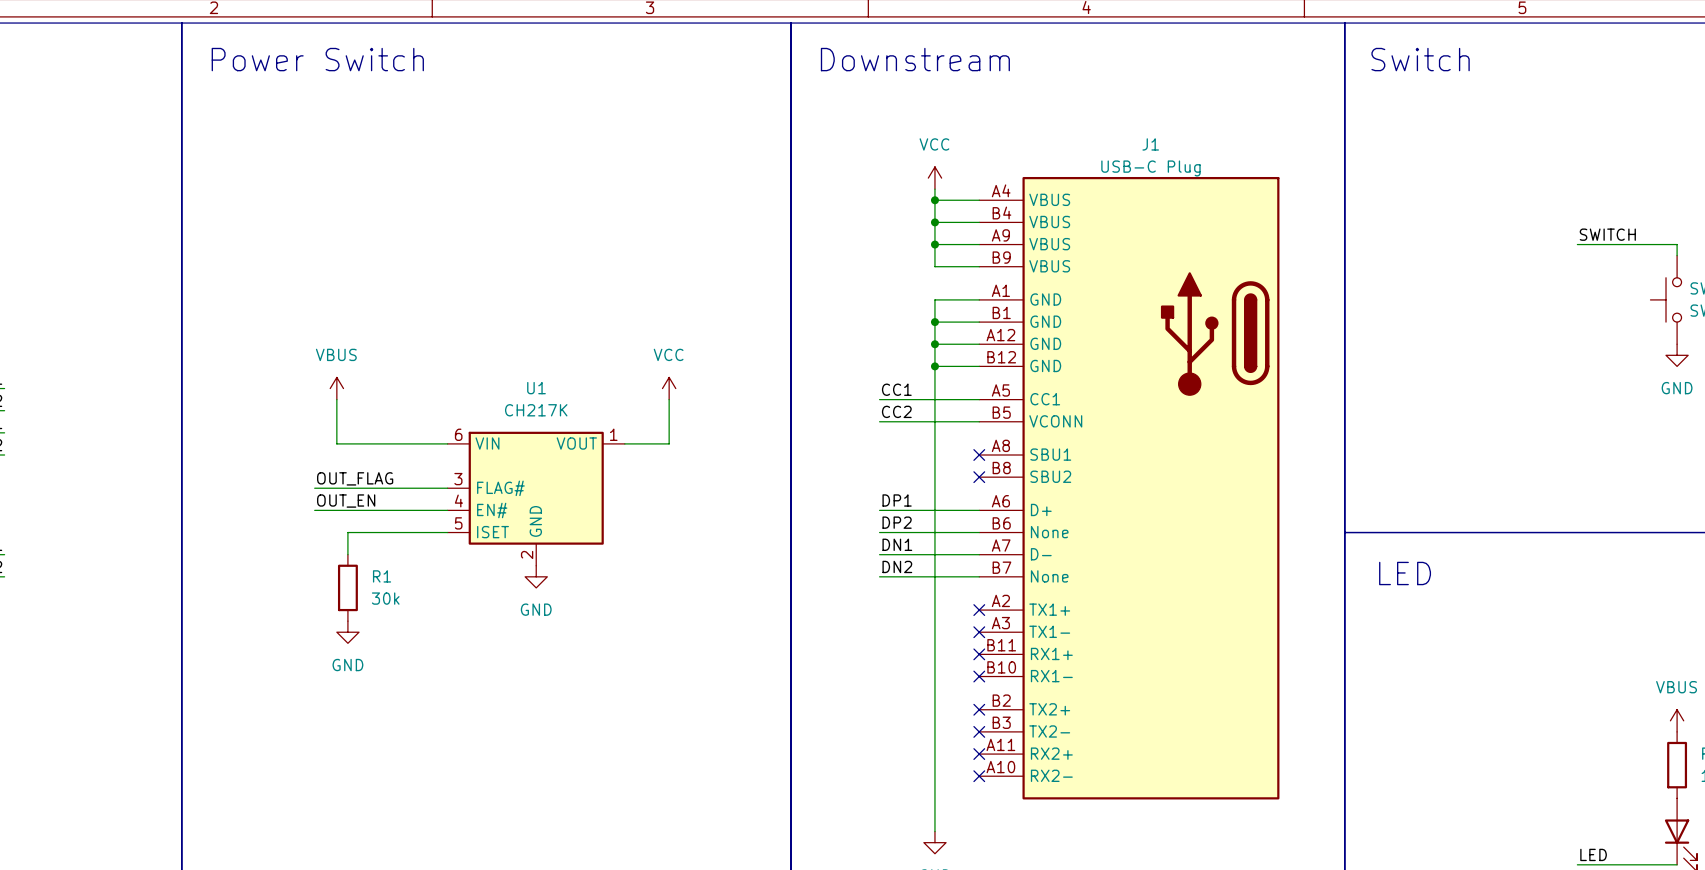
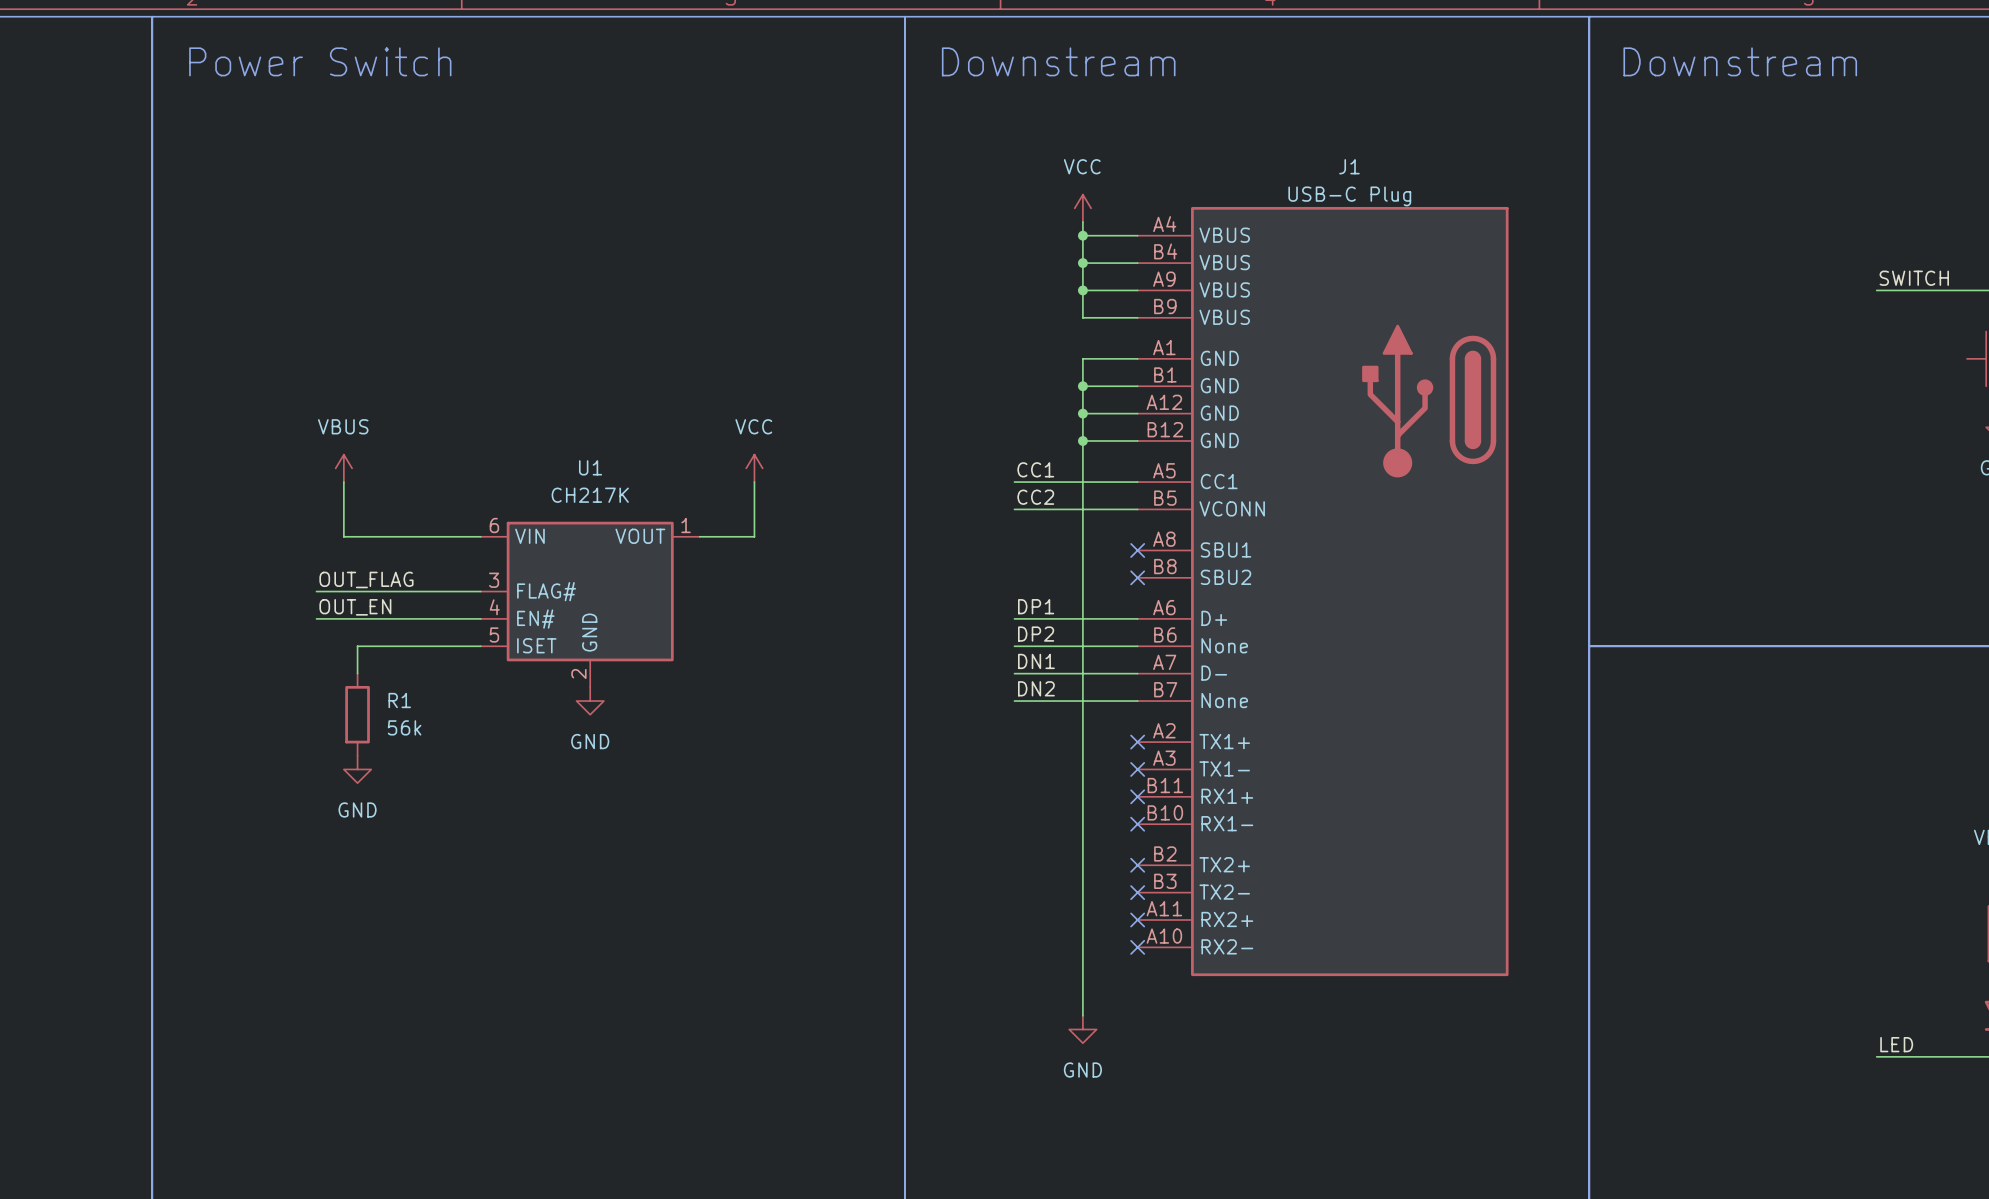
text: Switch (1420, 59) -> Downstream (1740, 61)
text: LED (1405, 573) -> none
R1 value: 30k (385, 598) -> 56k (404, 727)

